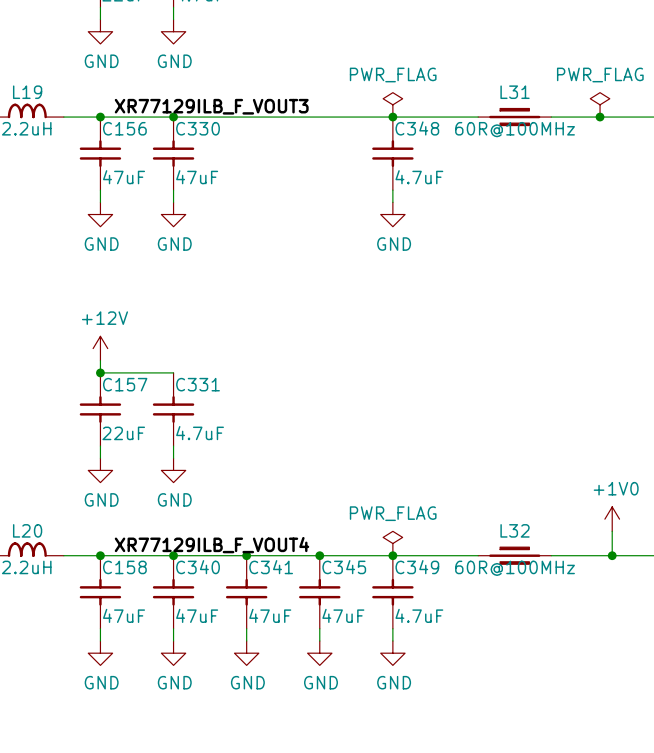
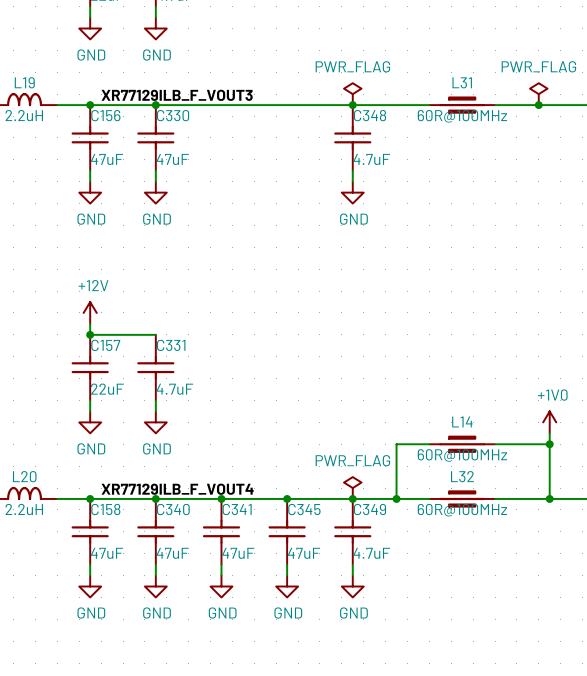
wire: none -> (429, 444) (396, 444) (396, 498)
L14: none -> (462, 444)
wire: none -> (495, 444) (549, 444)
junction: none -> (549, 444)
power symbol position: +1V0 (612, 519) -> +1V0 (549, 422)
junction: none -> (396, 498)

